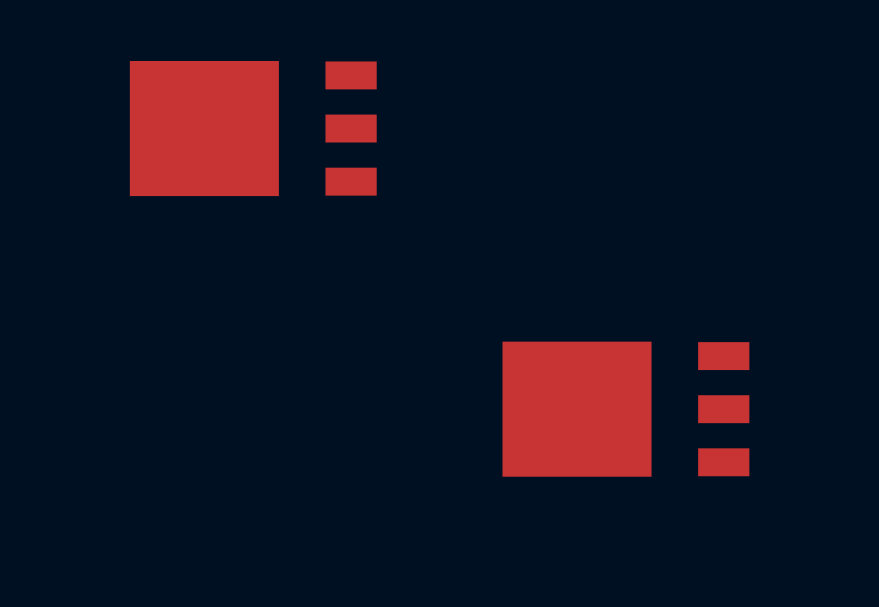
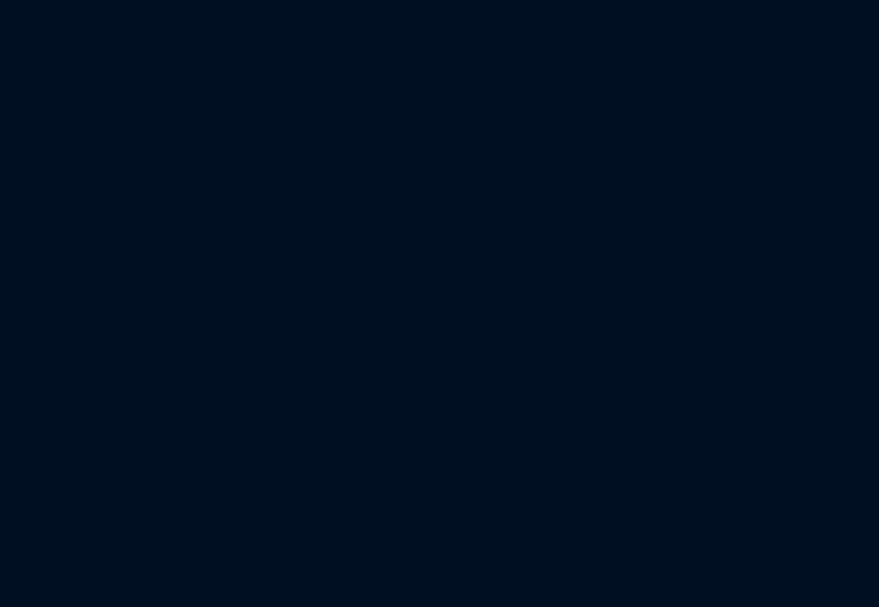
part: (253, 128) -> none
part: (625, 409) -> none

